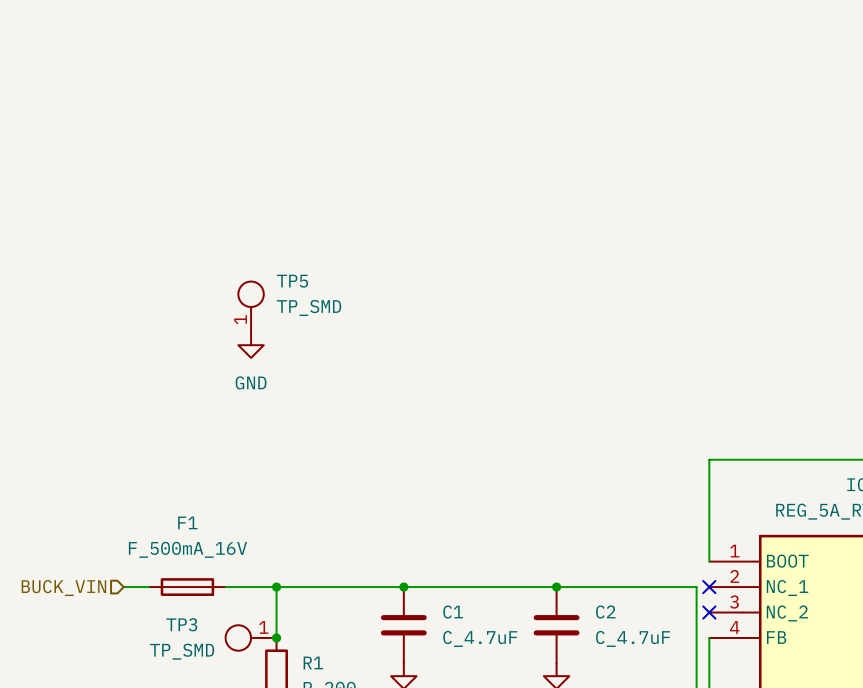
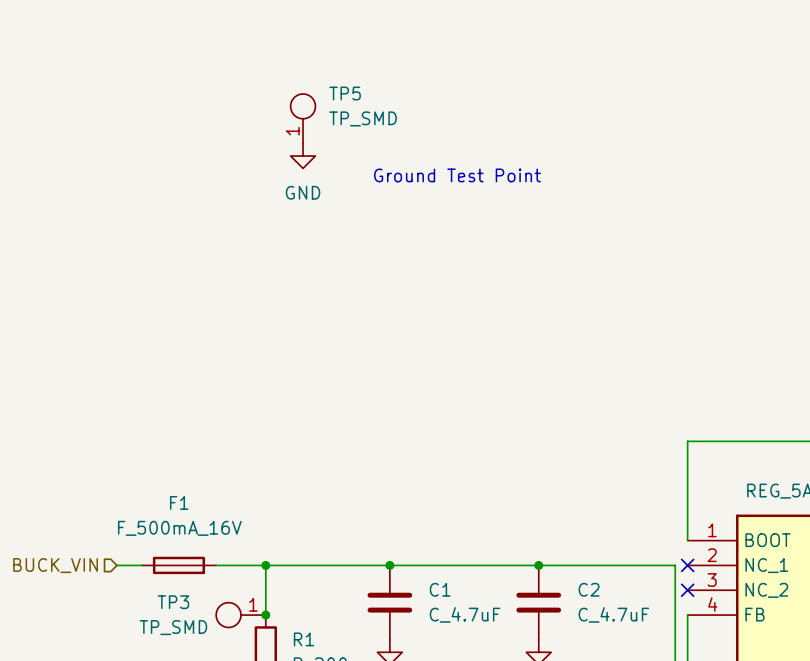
text: none -> Ground Test Point (457, 175)
TP5 position: (251, 307) -> (303, 118)
power symbol position: GND (251, 345) -> GND (303, 156)

